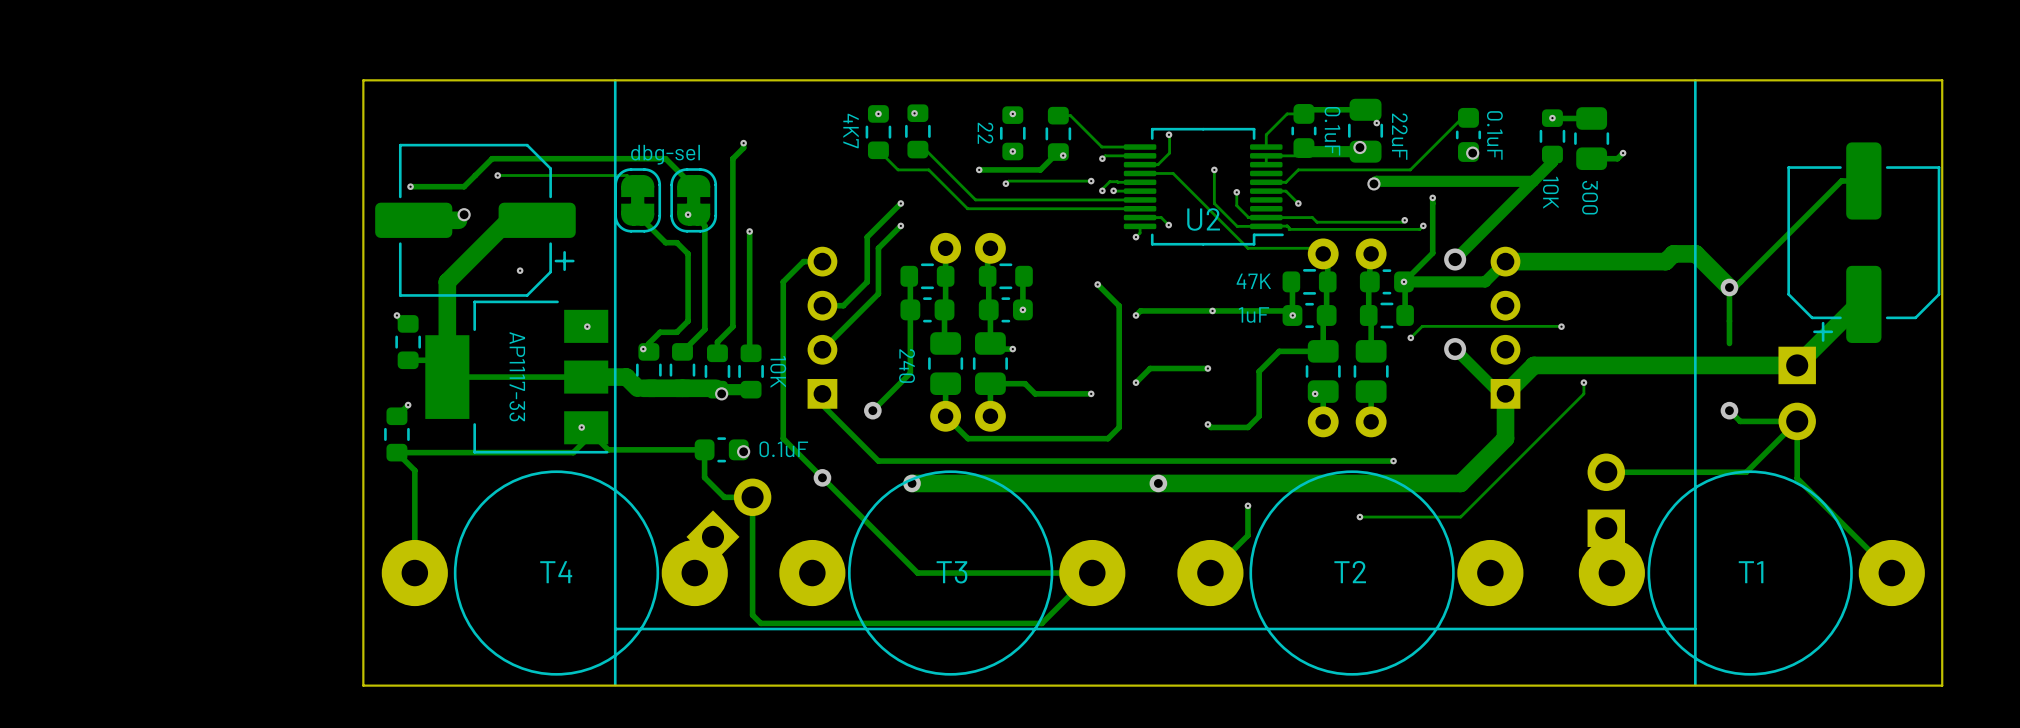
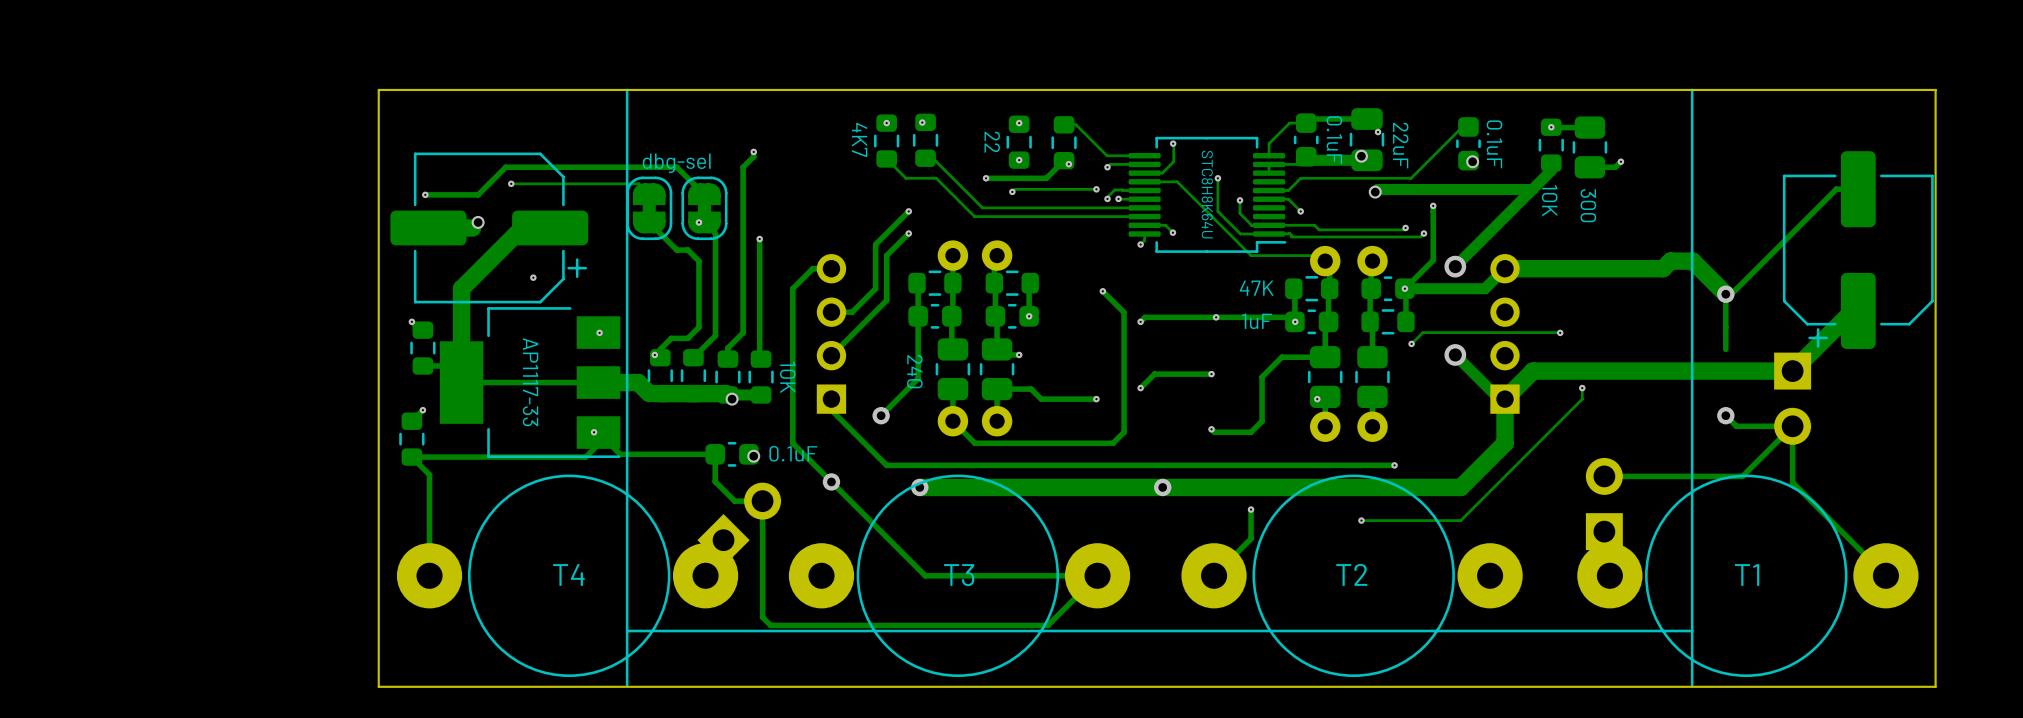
U2 value: none -> STC8H8K64U (1207, 194)
U2 name: U2 (1203, 219) -> none

